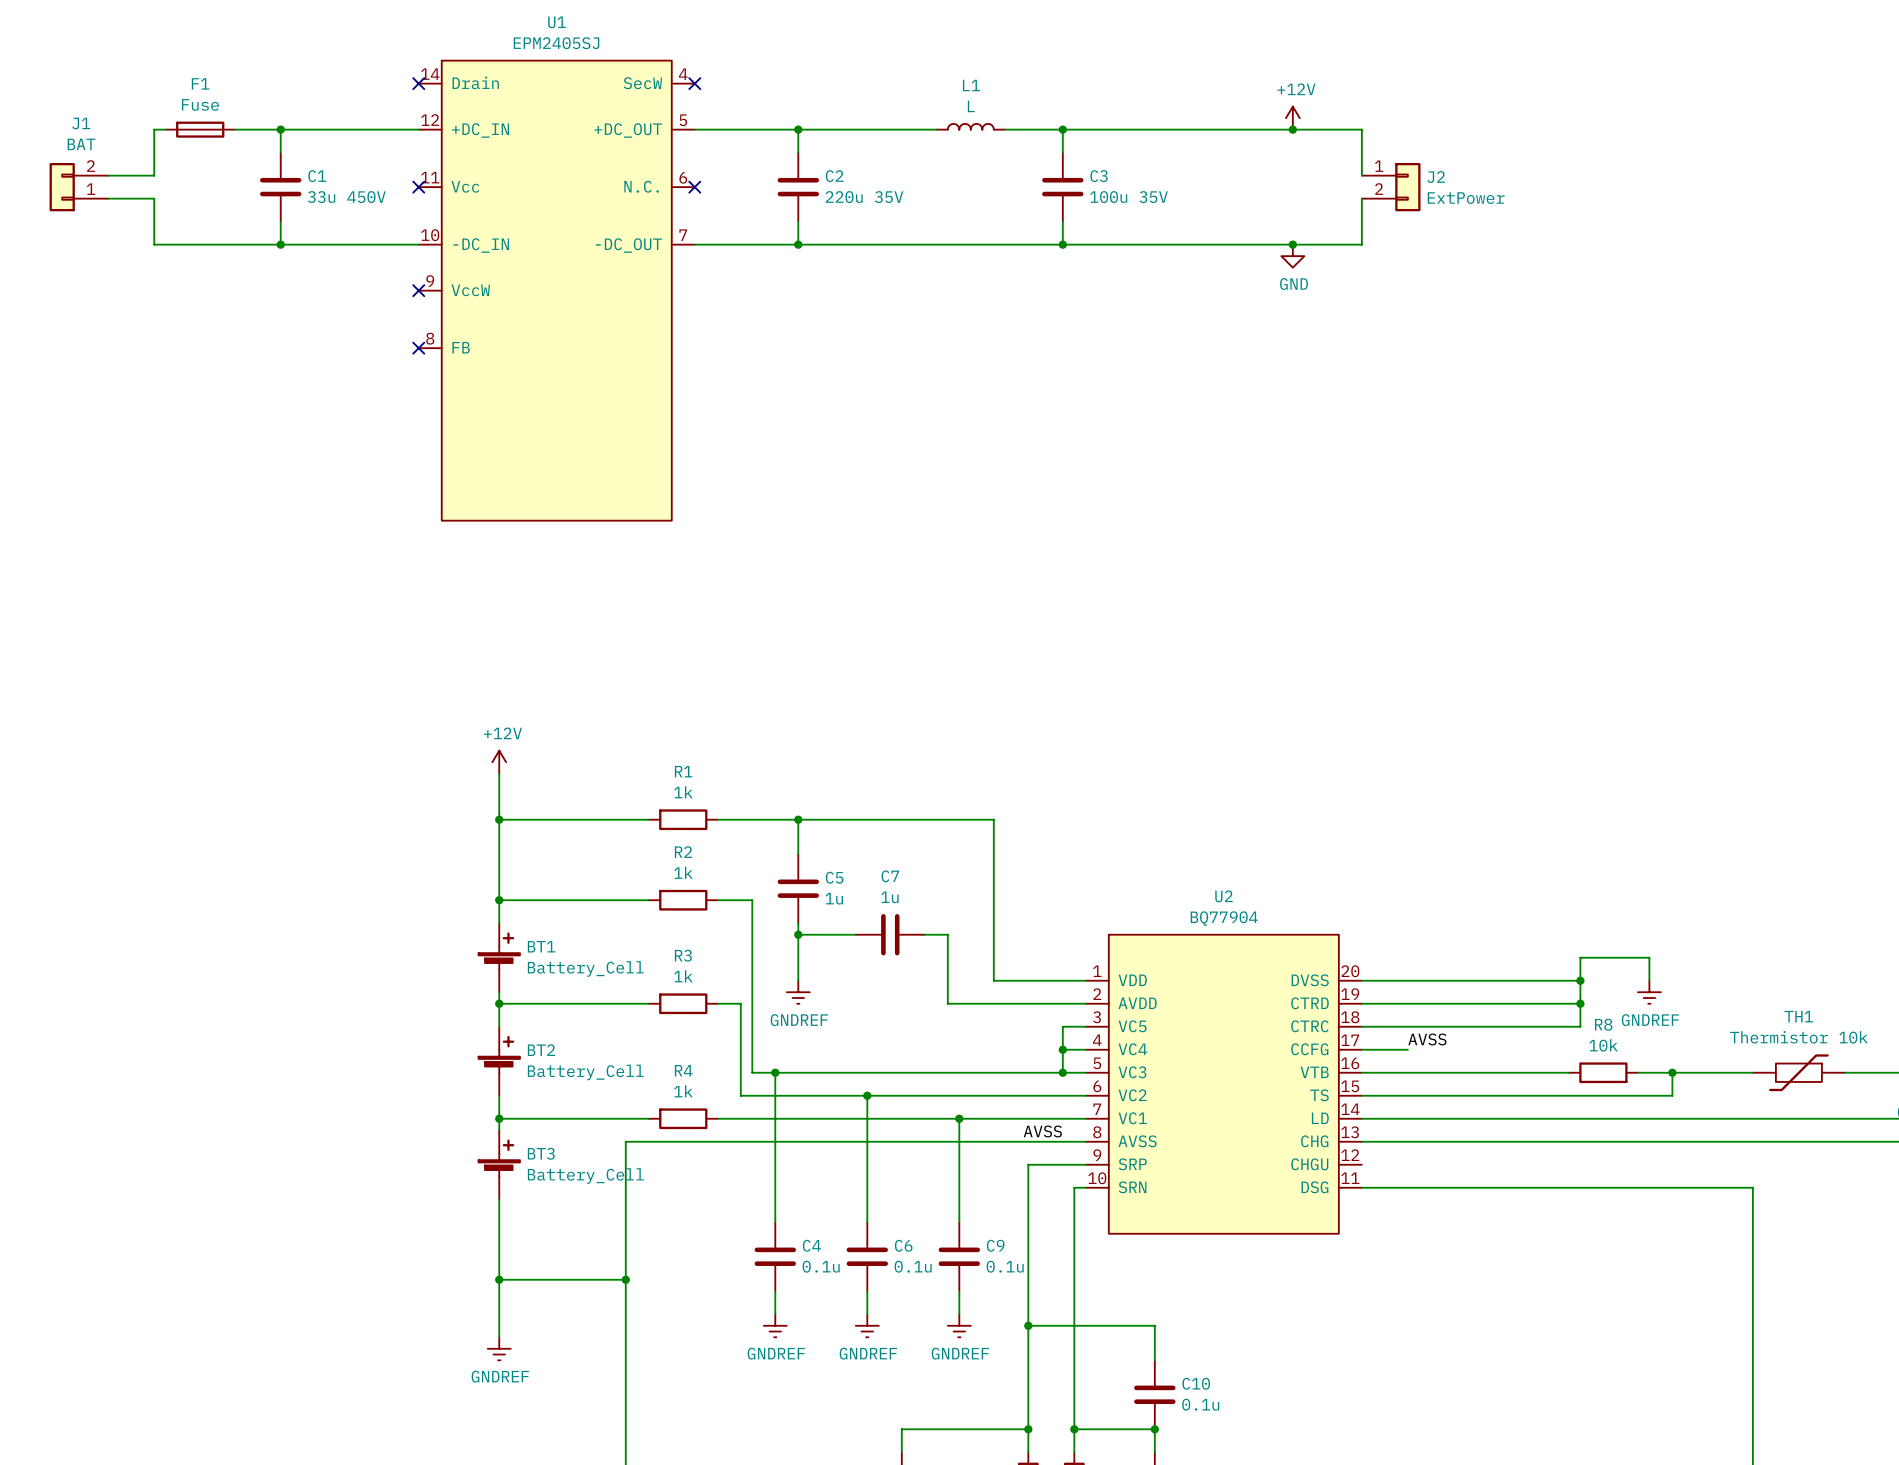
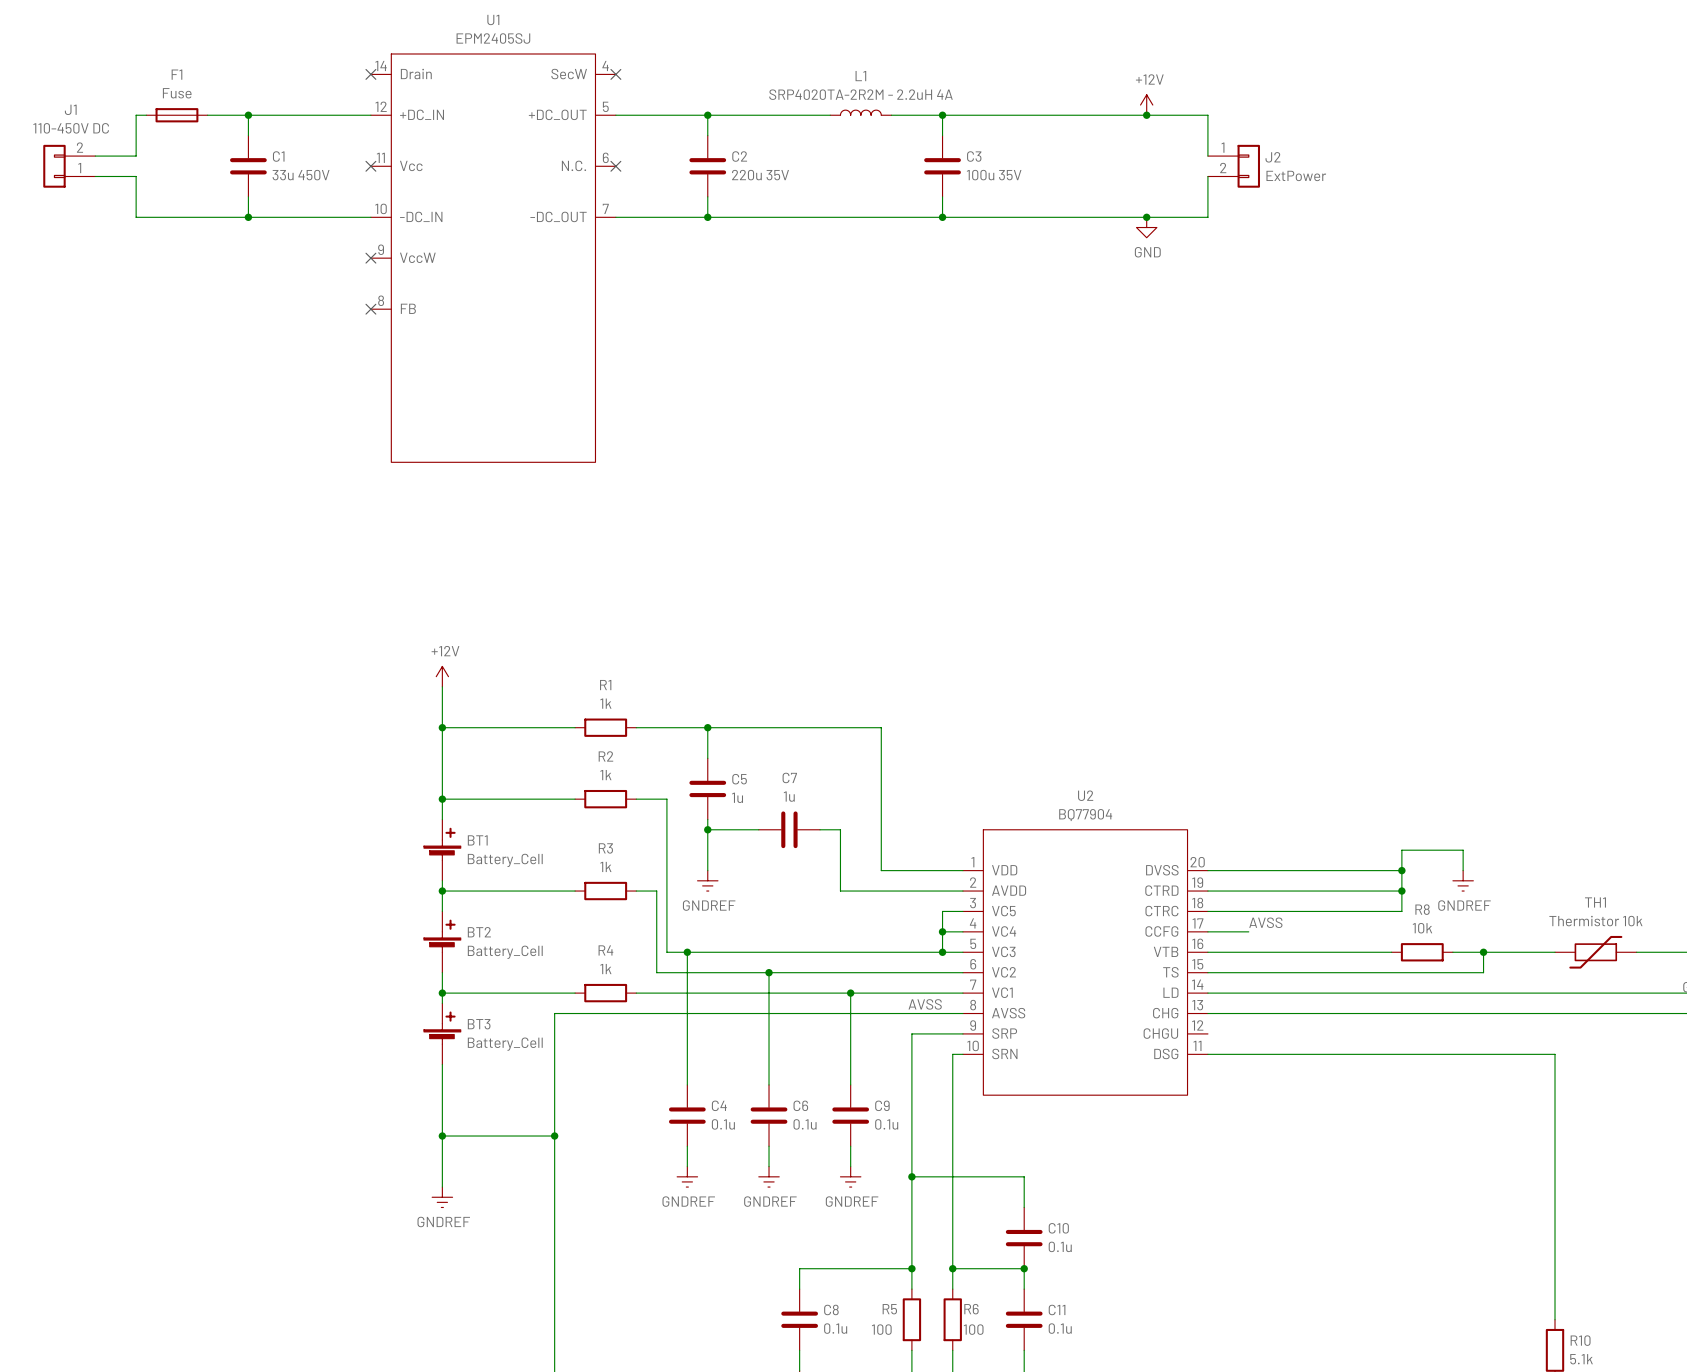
L1 value: L (971, 106) -> SRP4020TA-2R2M - 2.2uH 4A (861, 94)
J1 value: BAT (81, 144) -> 110-450V DC (71, 128)

